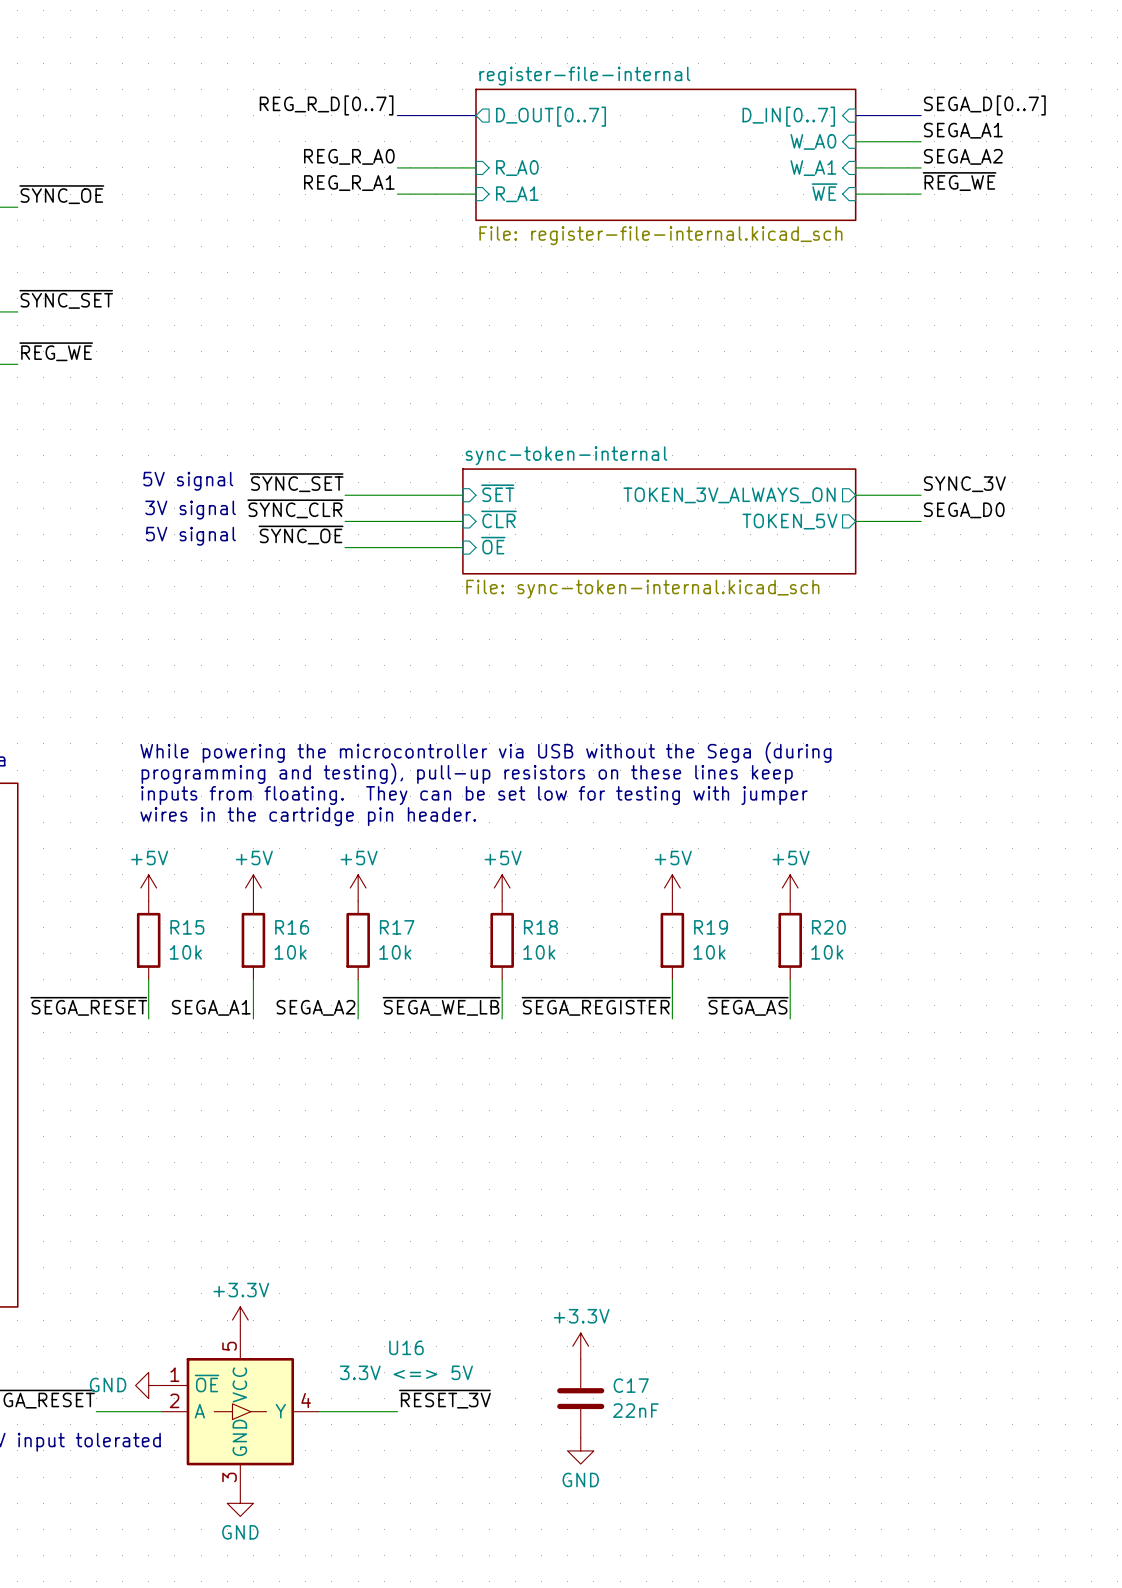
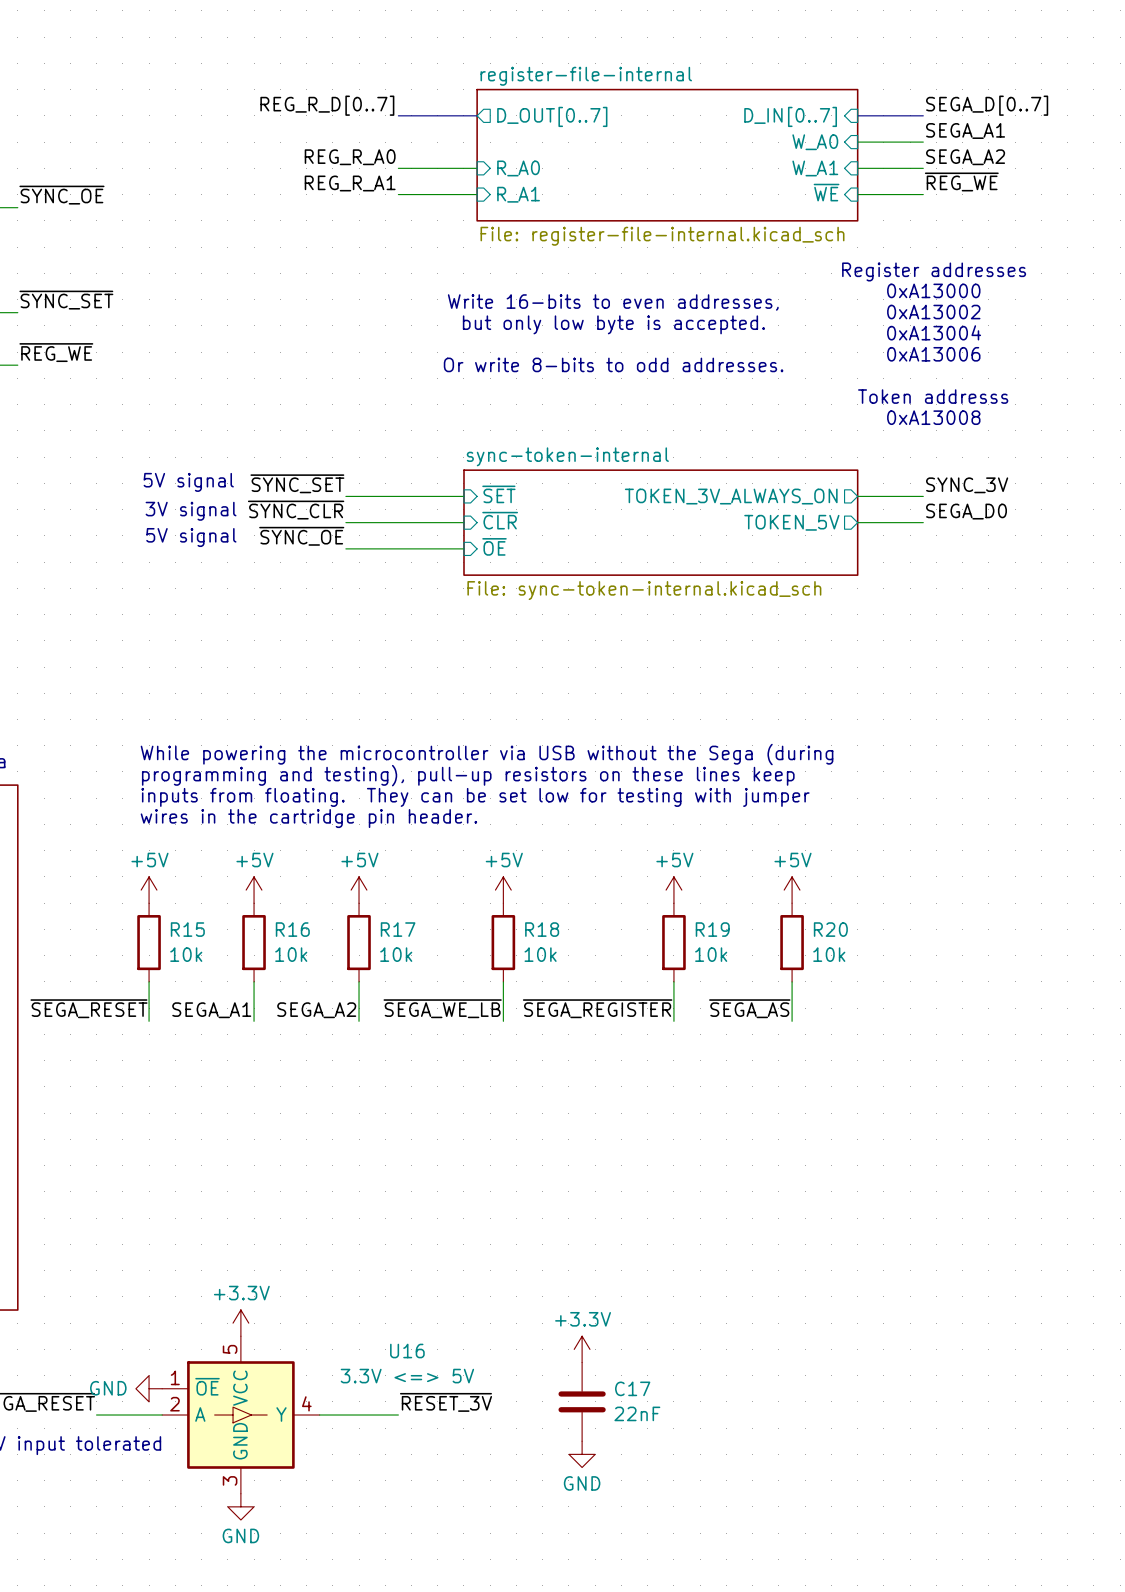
text: none -> Register addresses (934, 271)
text: none -> 0xA13000 (933, 290)
text: none -> Write 16-bits to even addresses, (613, 302)
text: none -> 0xA13002 (933, 312)
text: none -> but only low byte is accepted. (613, 324)
text: none -> 0xA13004 (934, 332)
text: none -> 0xA13006 (933, 354)
text: none -> Or write 8-bits to odd addresses. (613, 364)
text: none -> Token addresss (933, 396)
text: none -> 0xA13008 (933, 417)

